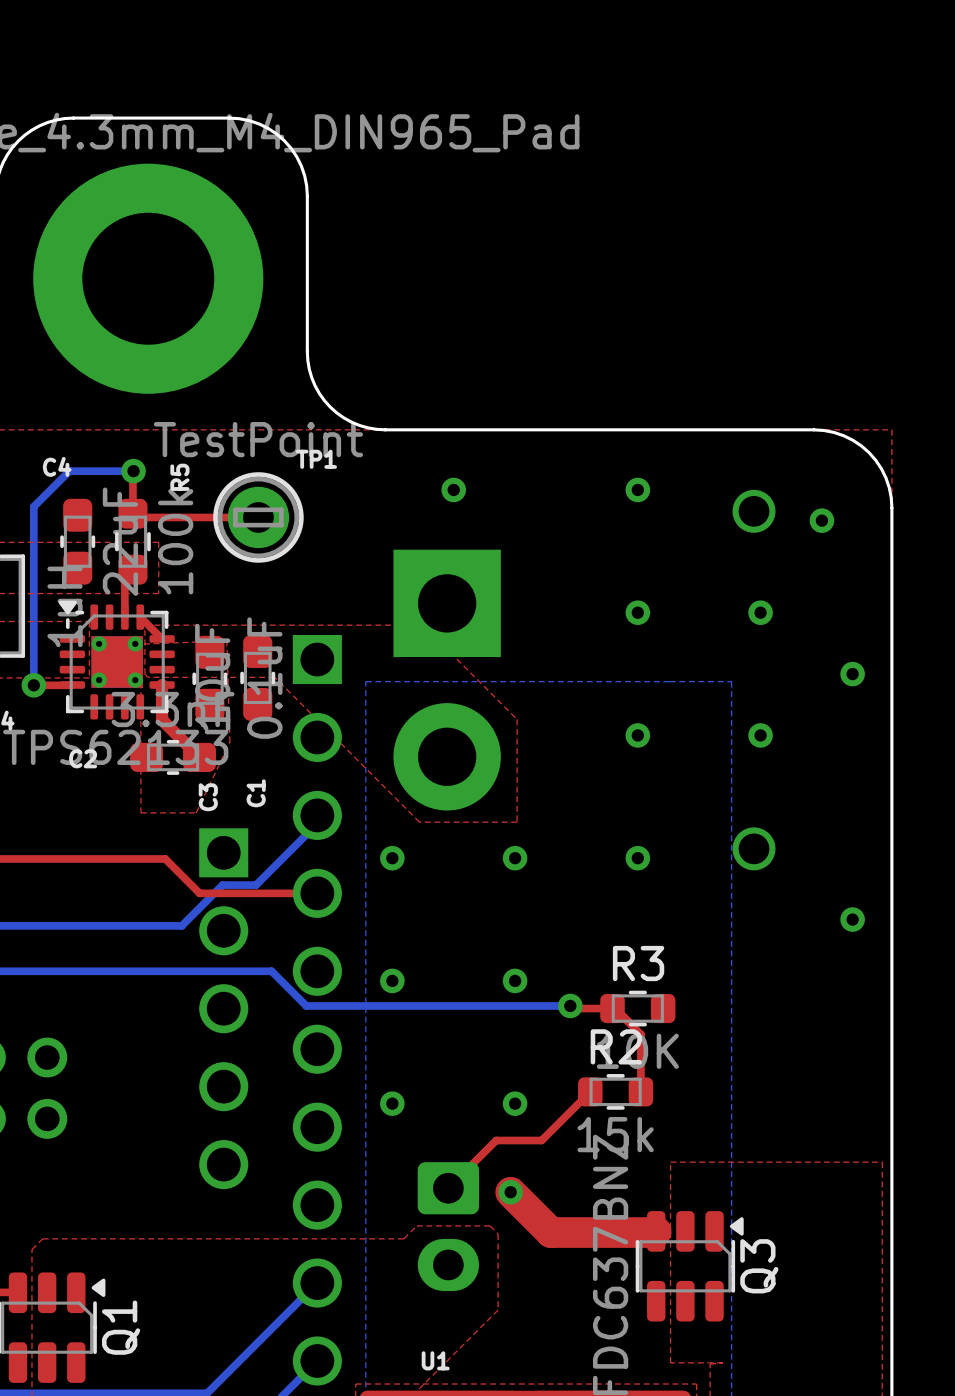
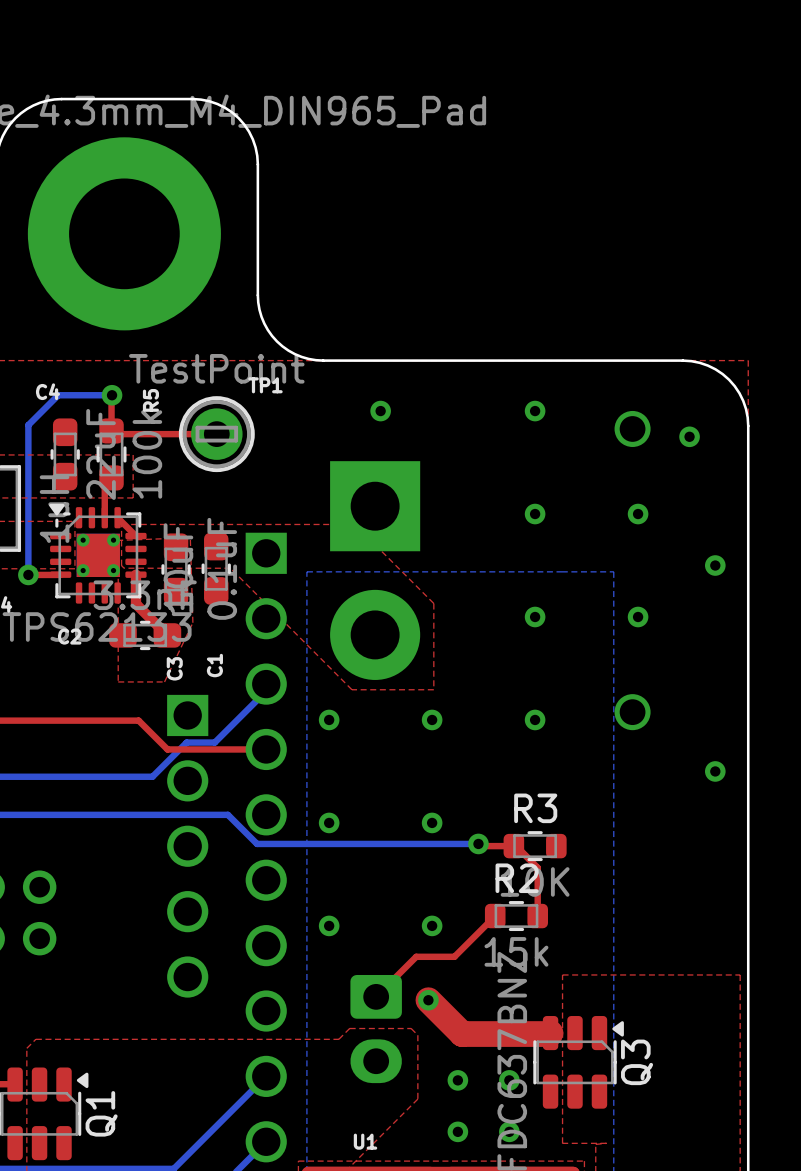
via: none -> (457, 1080)
via: none -> (509, 1080)
via: none -> (457, 1131)
via: none -> (509, 1131)

